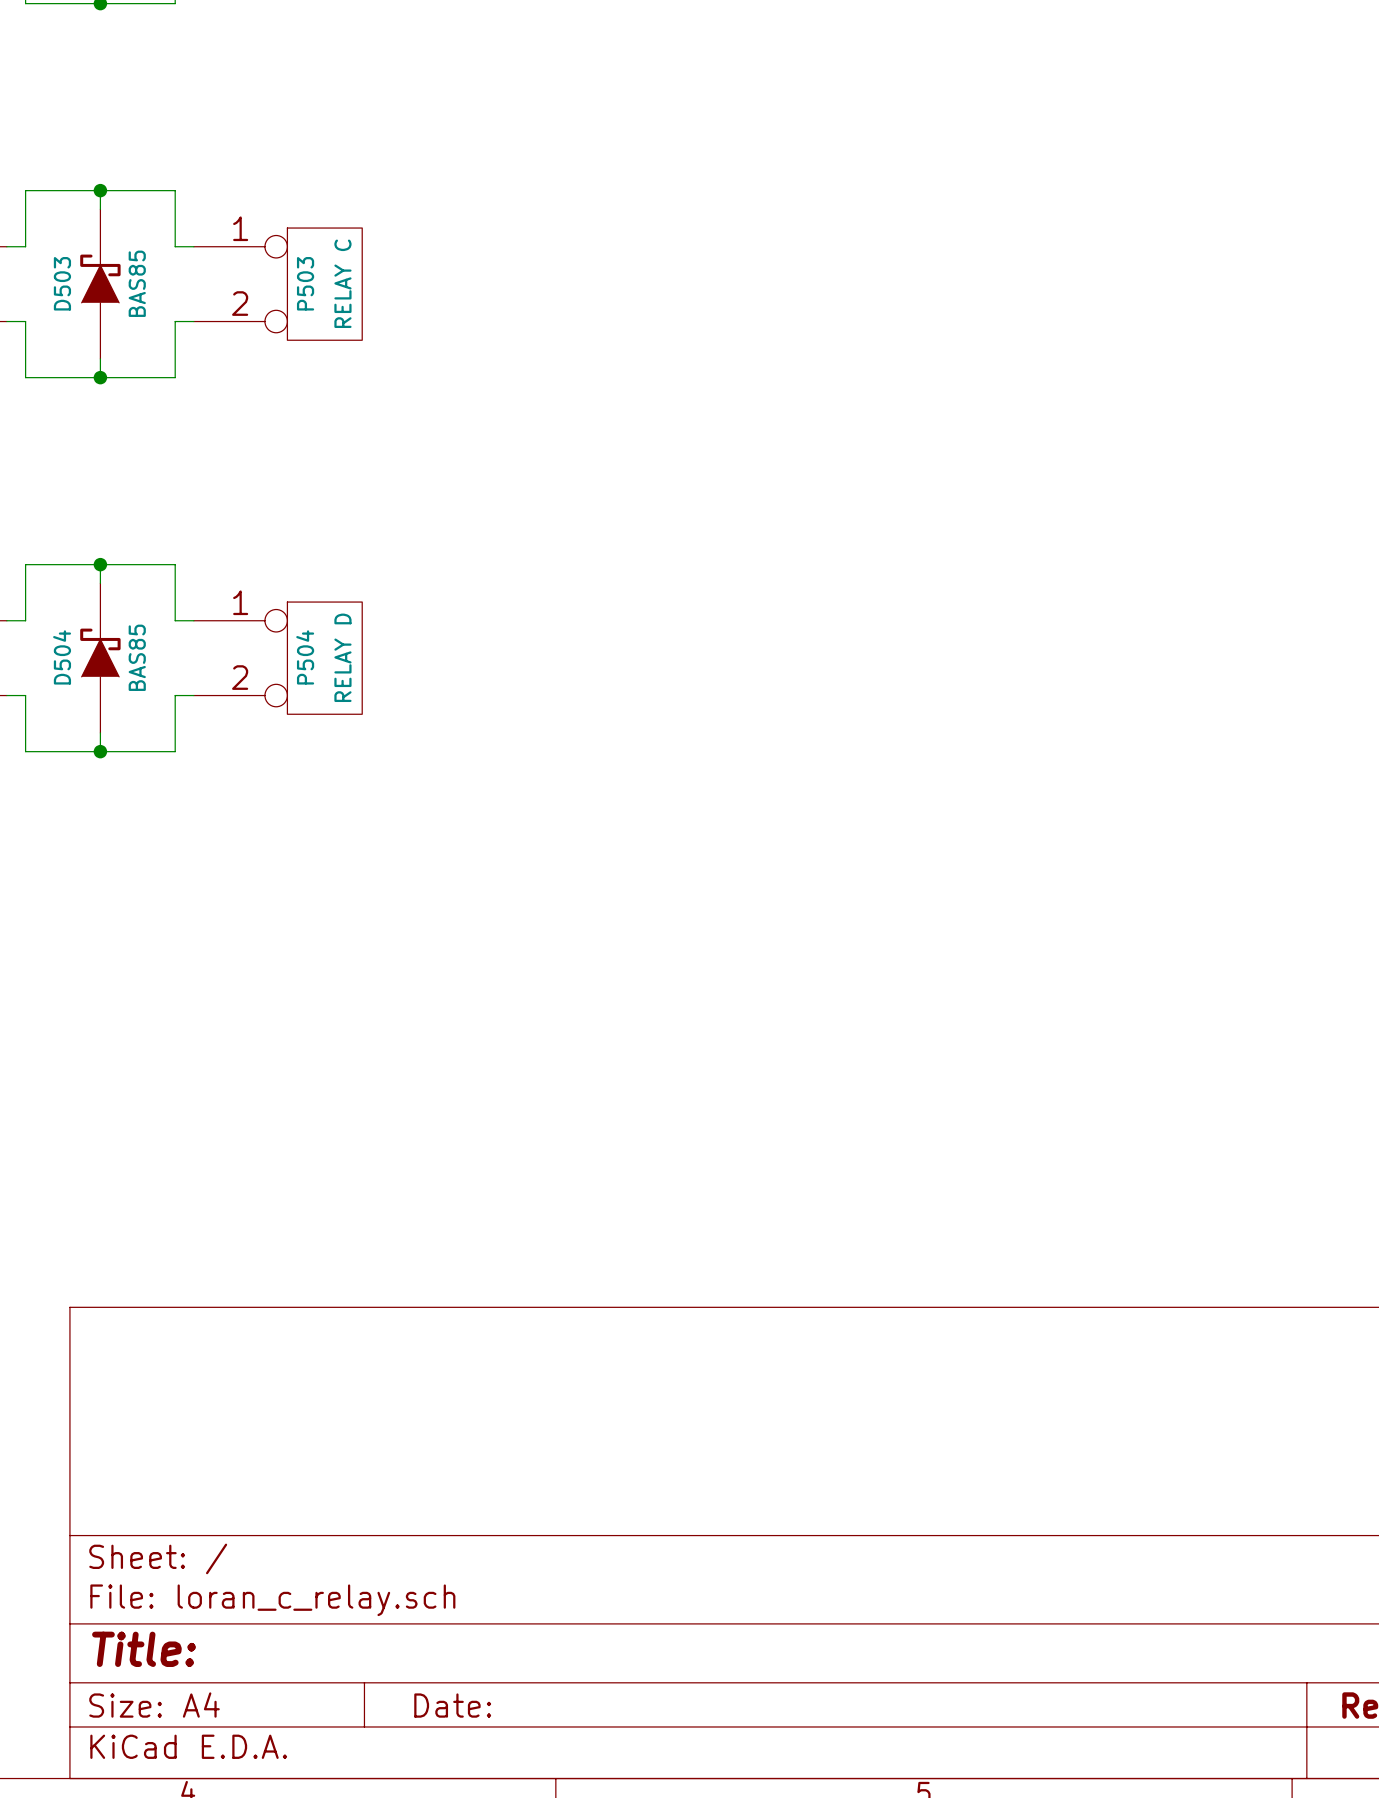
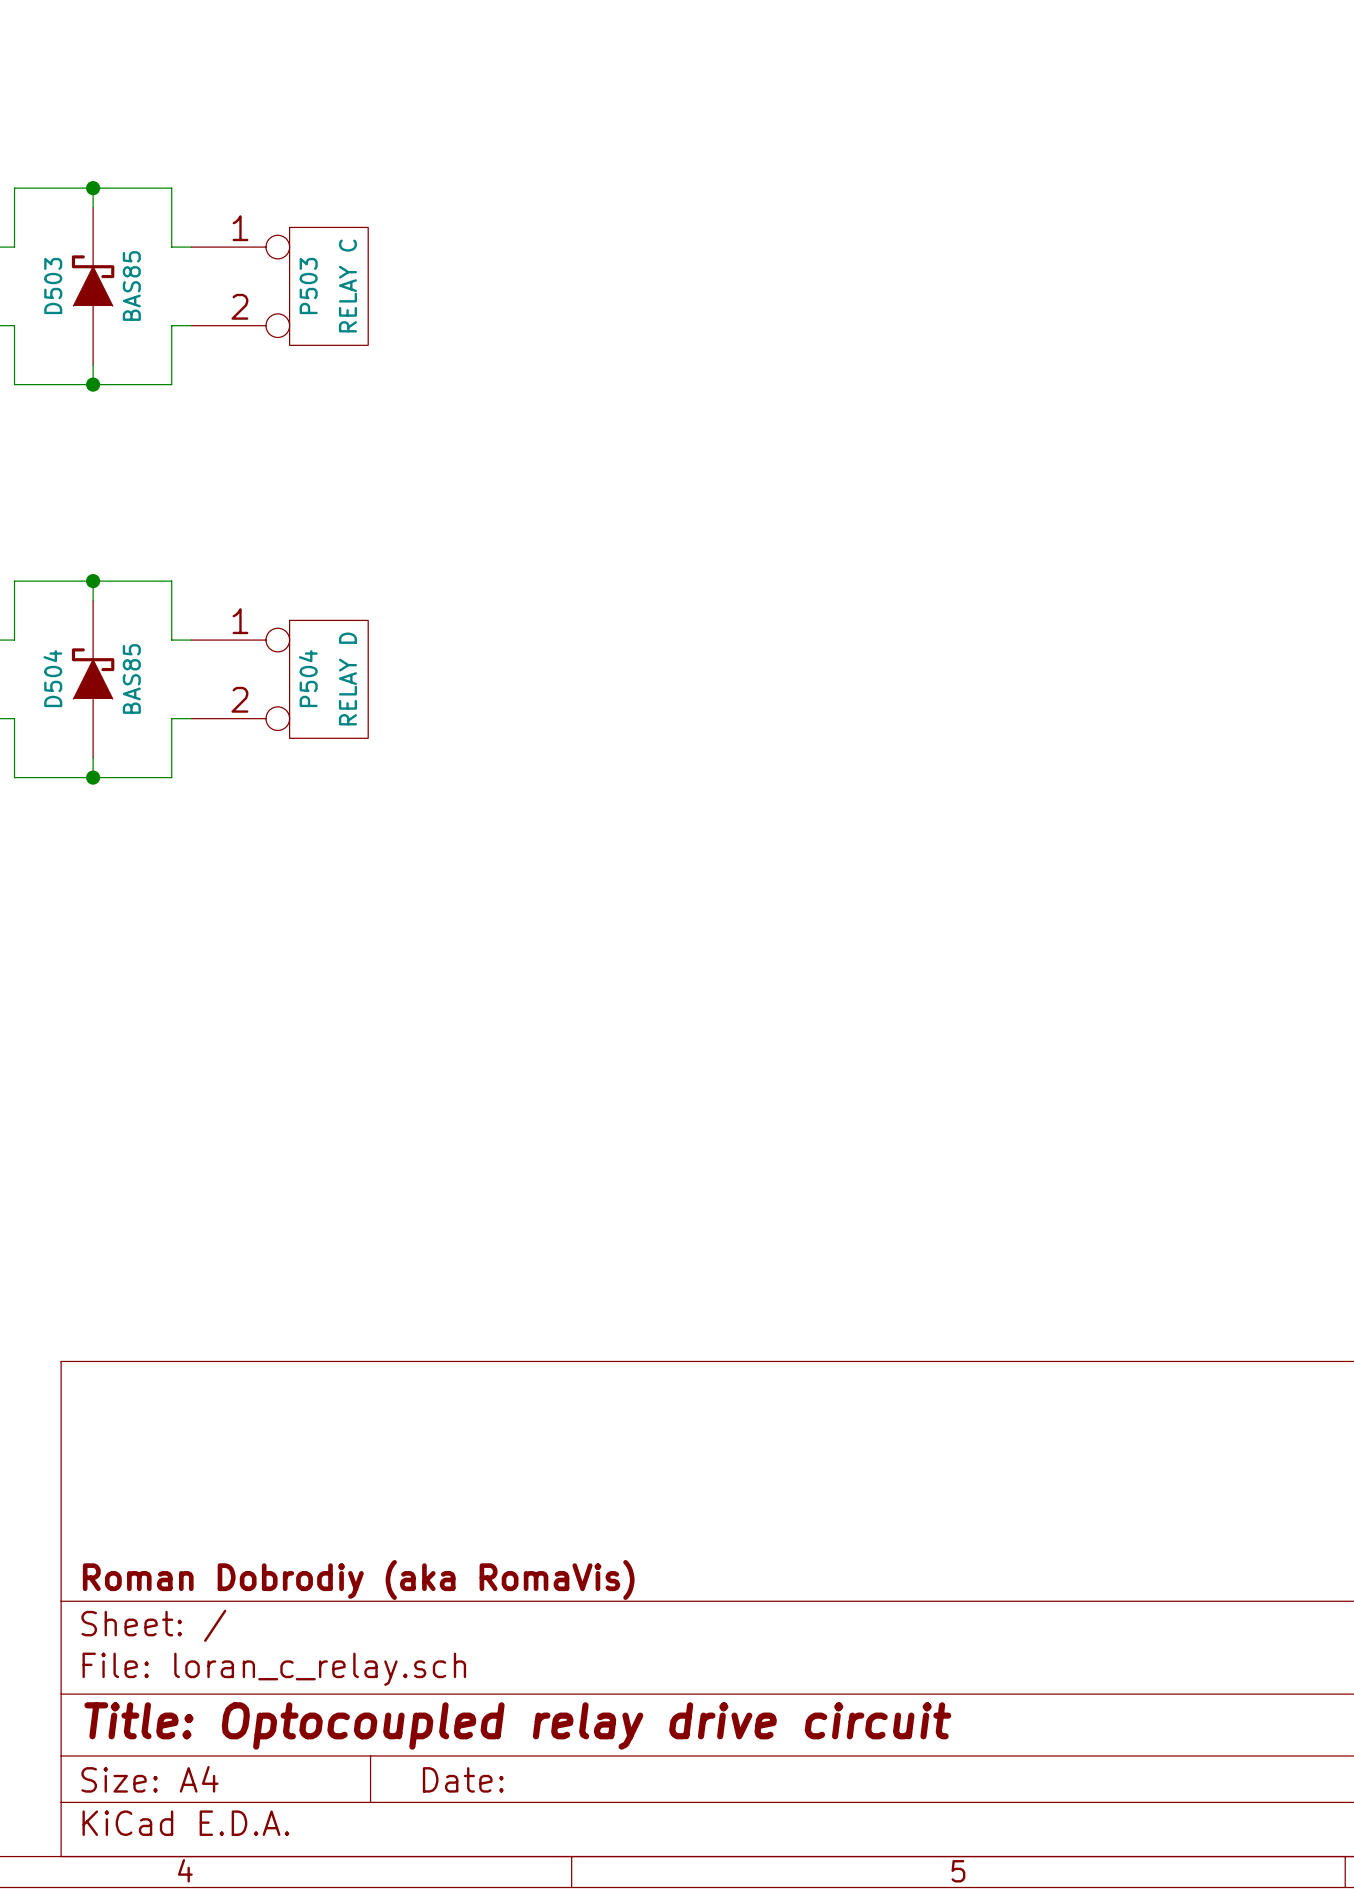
title block: none -> Roman Dobrodiy (aka RomaVis) (358, 1579)
title block: Title: (144, 1649) -> Title: Optocoupled relay drive circuit (517, 1725)

